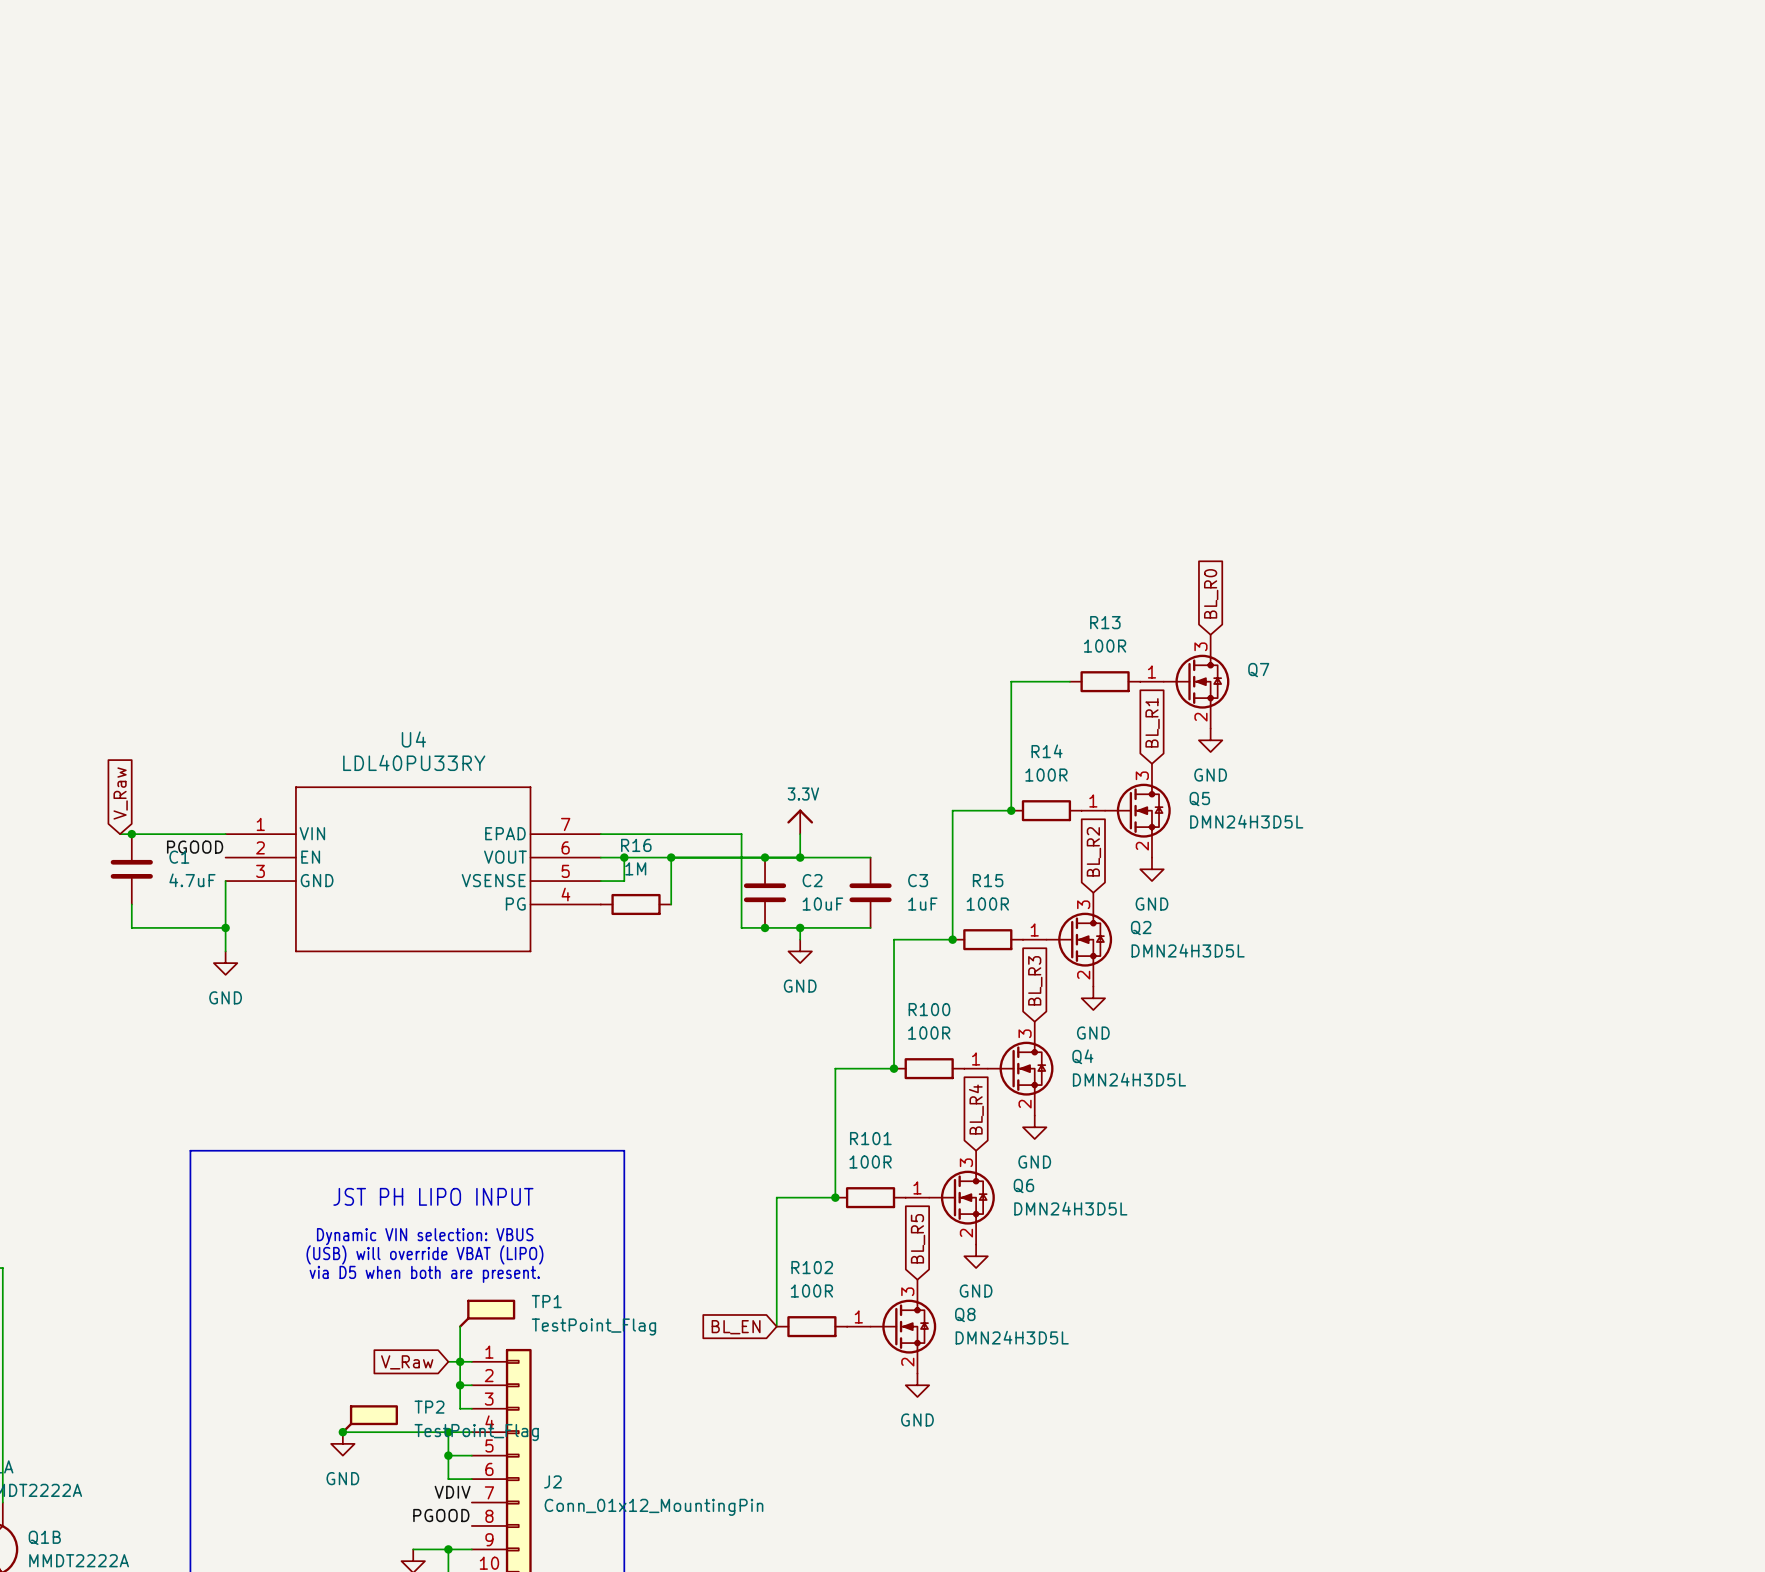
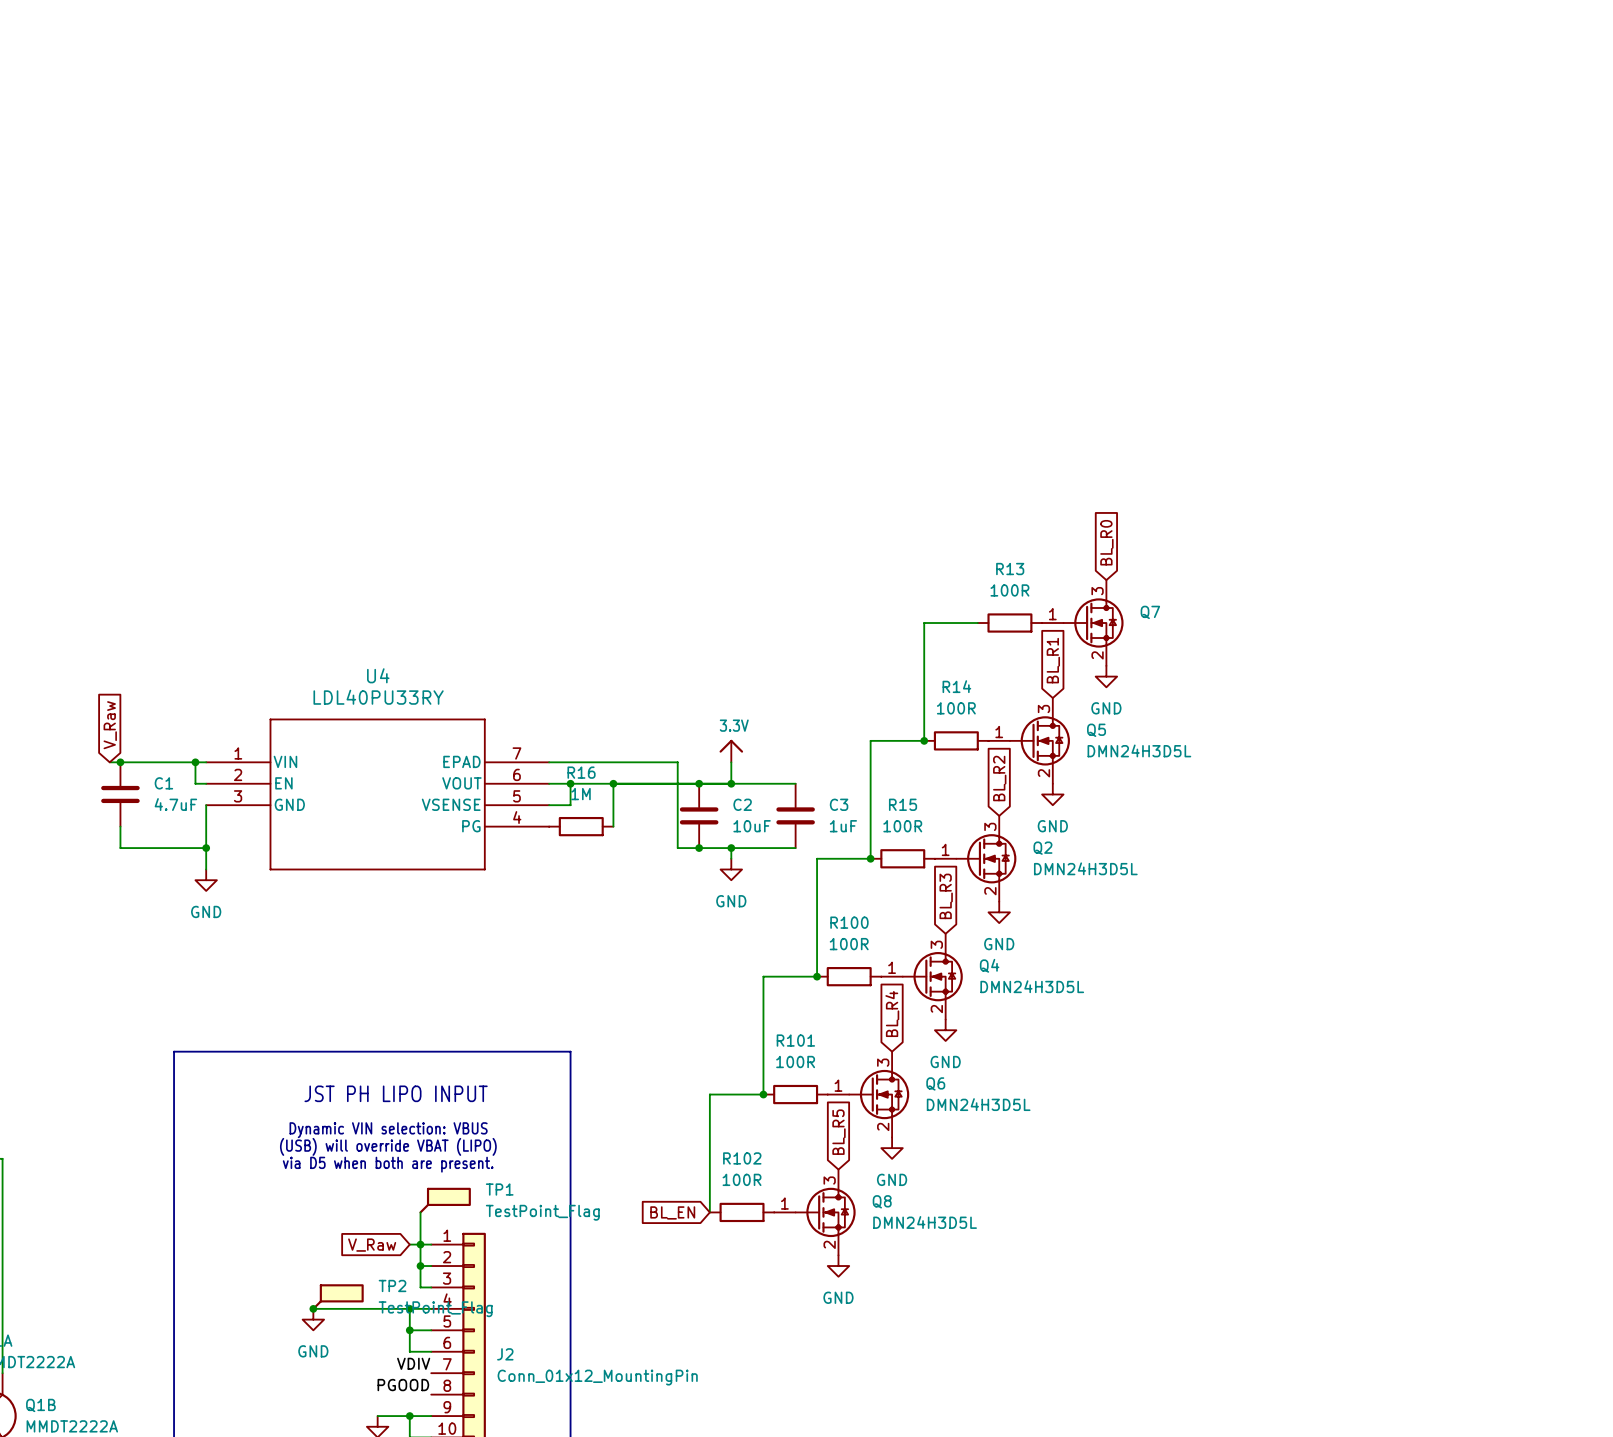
wire: none -> (195, 762) (195, 783) (206, 783)
junction: none -> (195, 762)
label: PGOOD (195, 847) -> none

